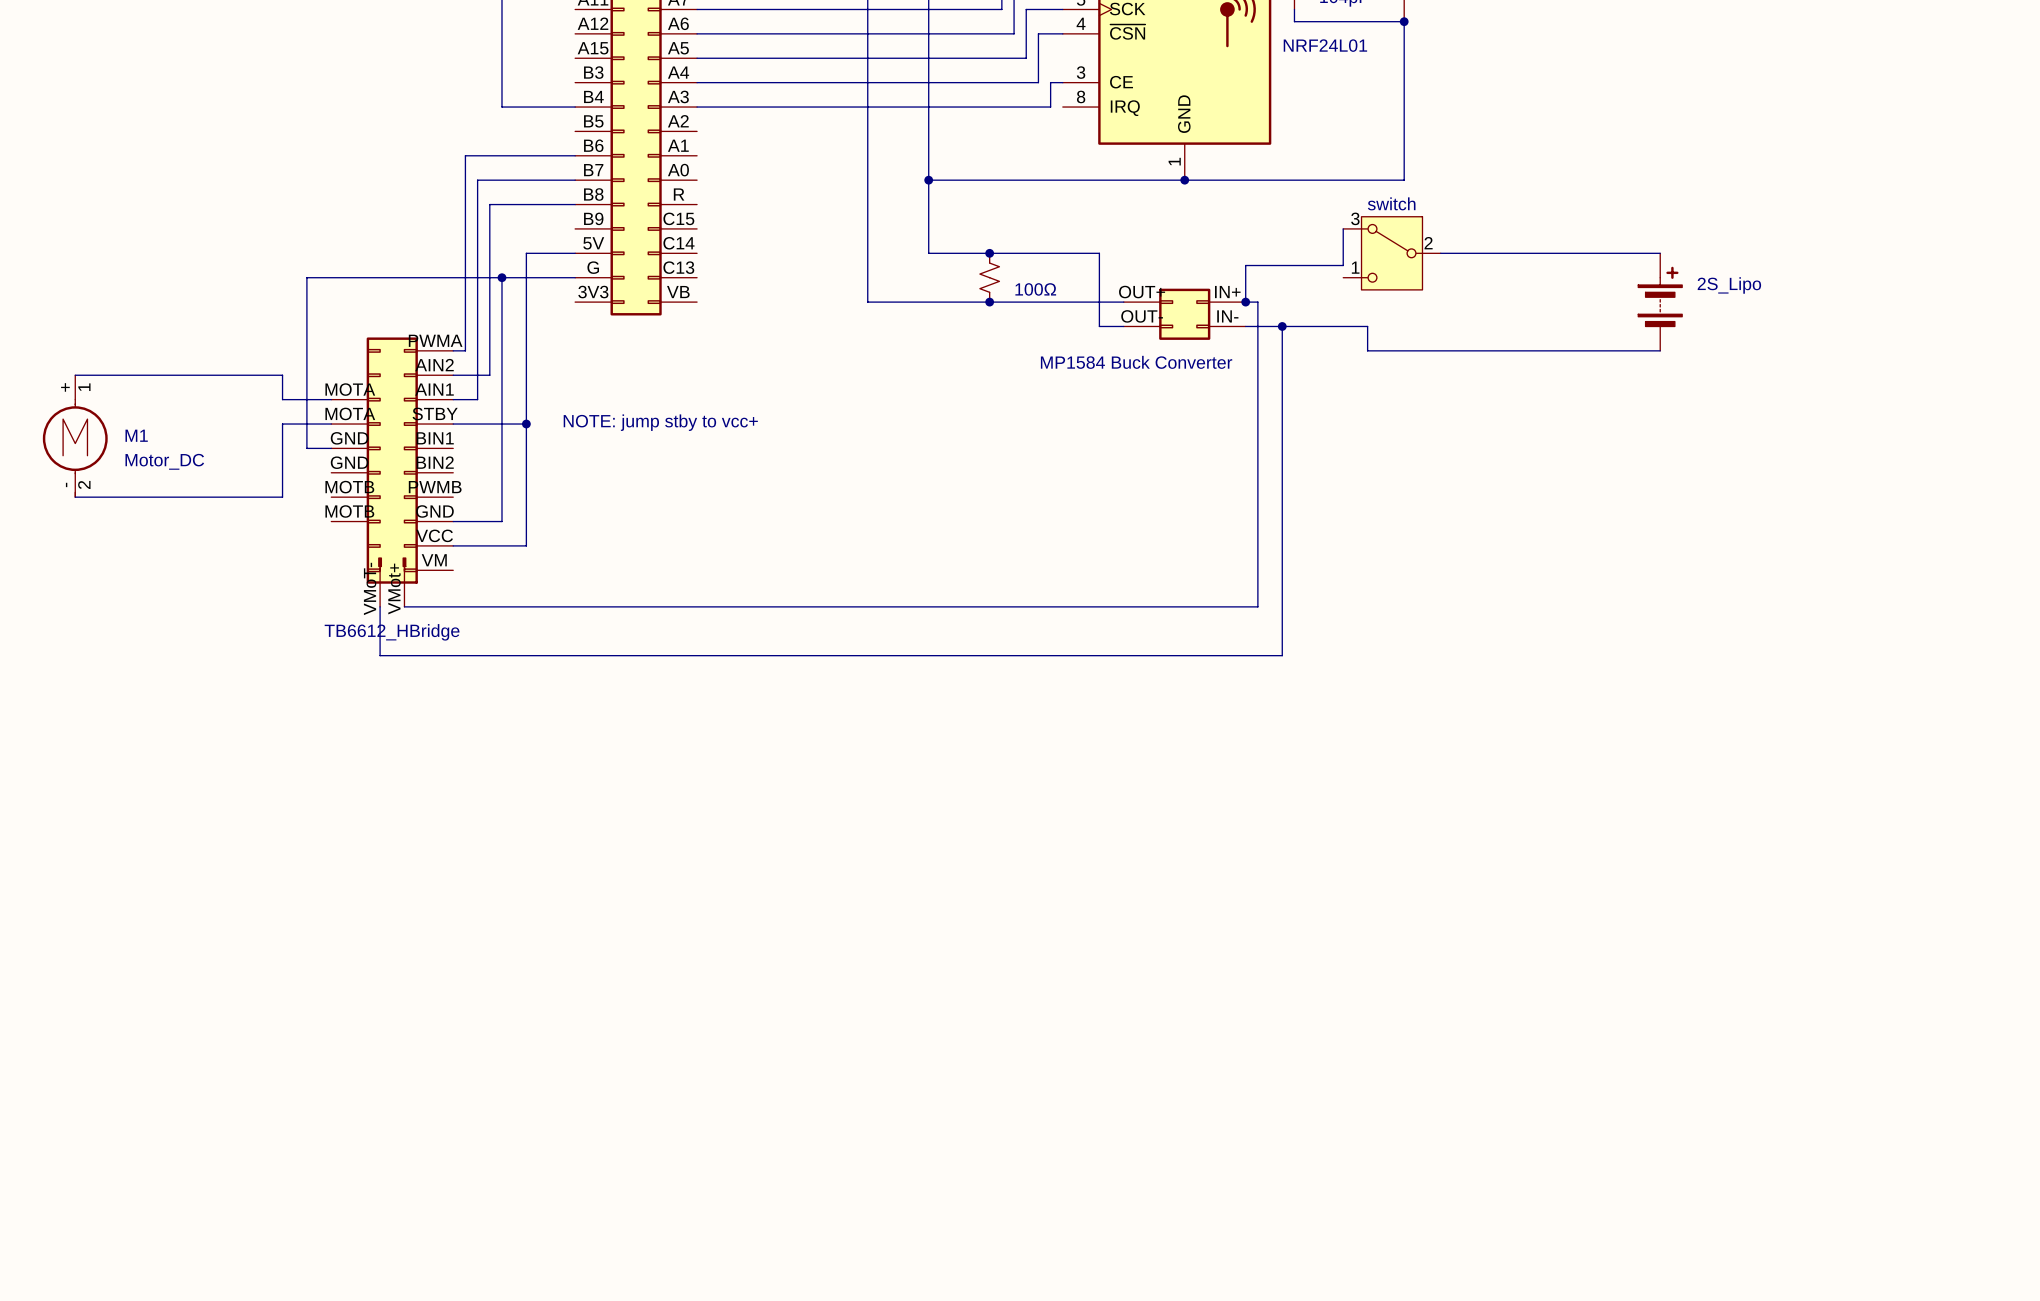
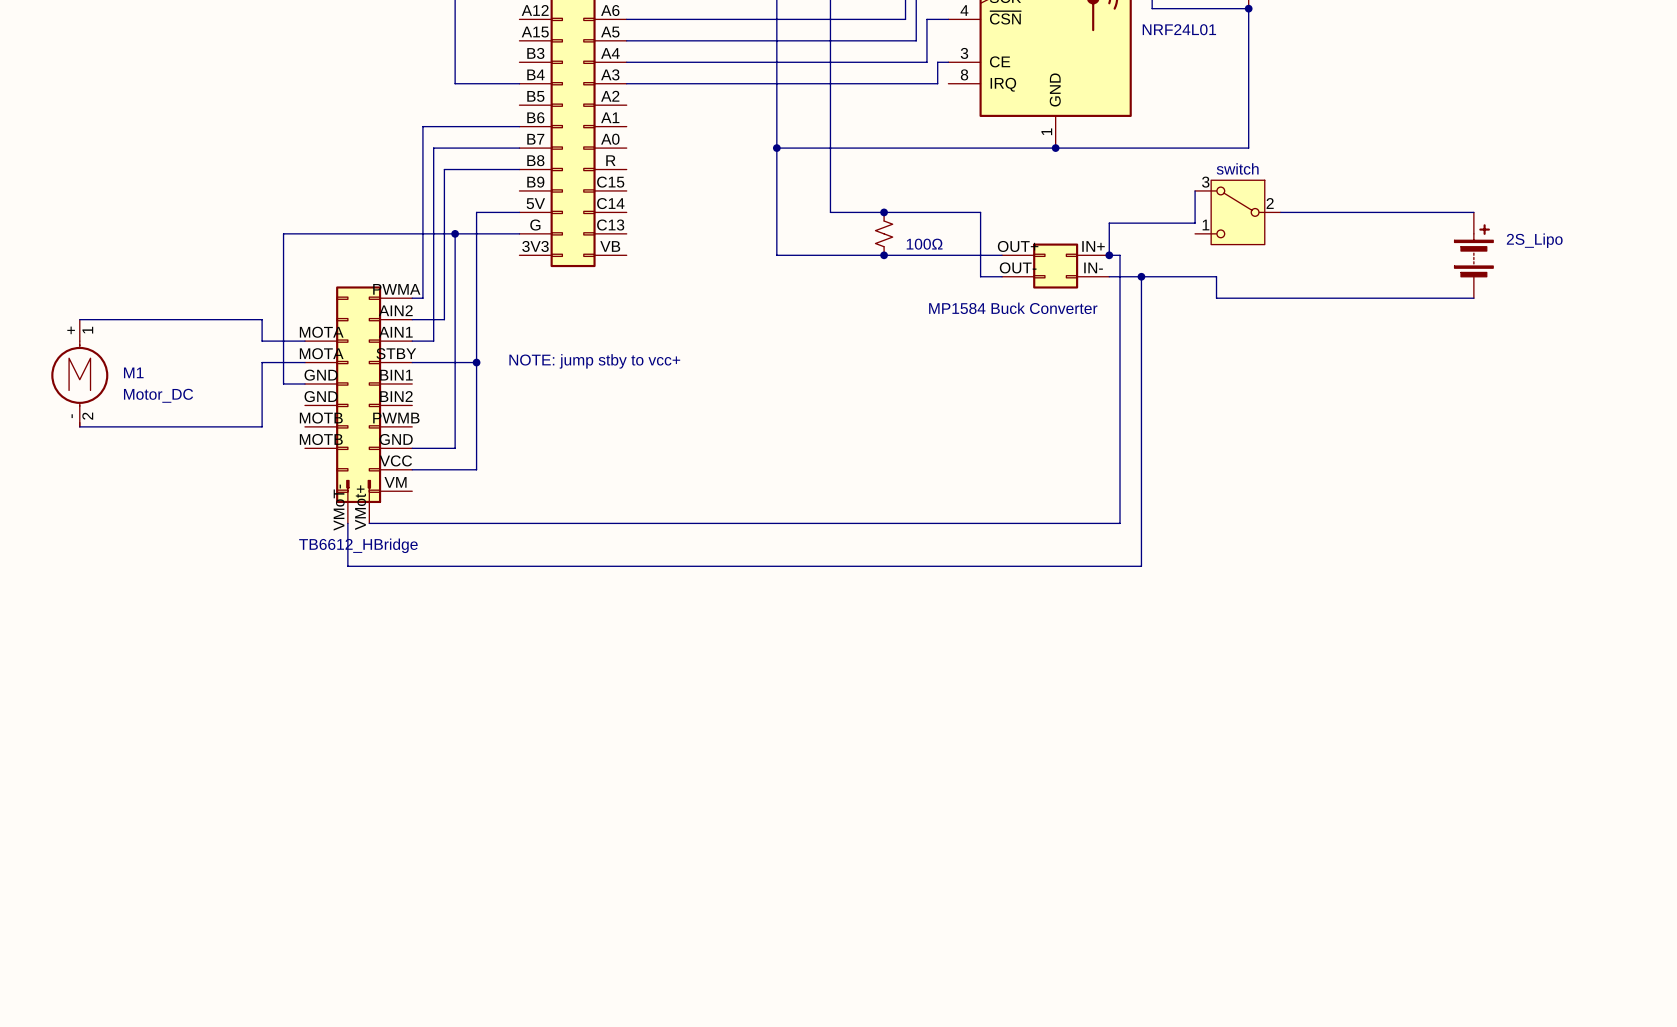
wire: none -> (776, 148) (830, 148)
junction: none -> (776, 148)
junction: (928, 180) -> none

